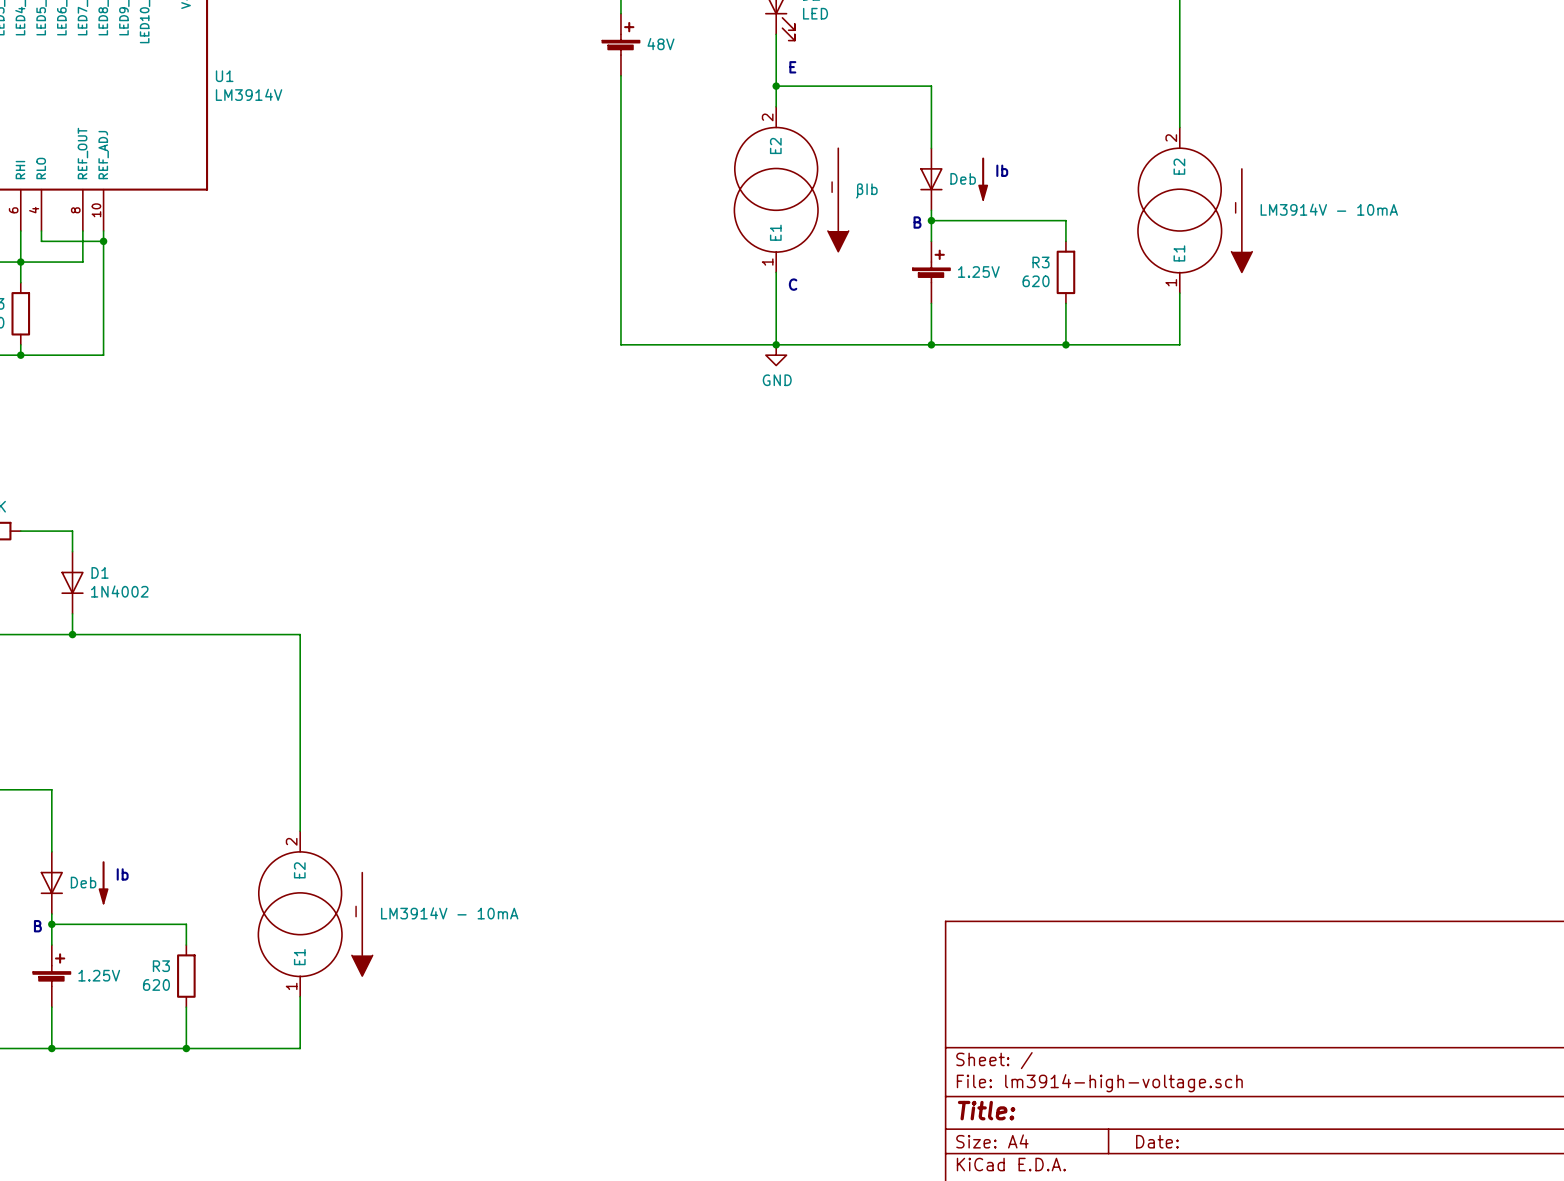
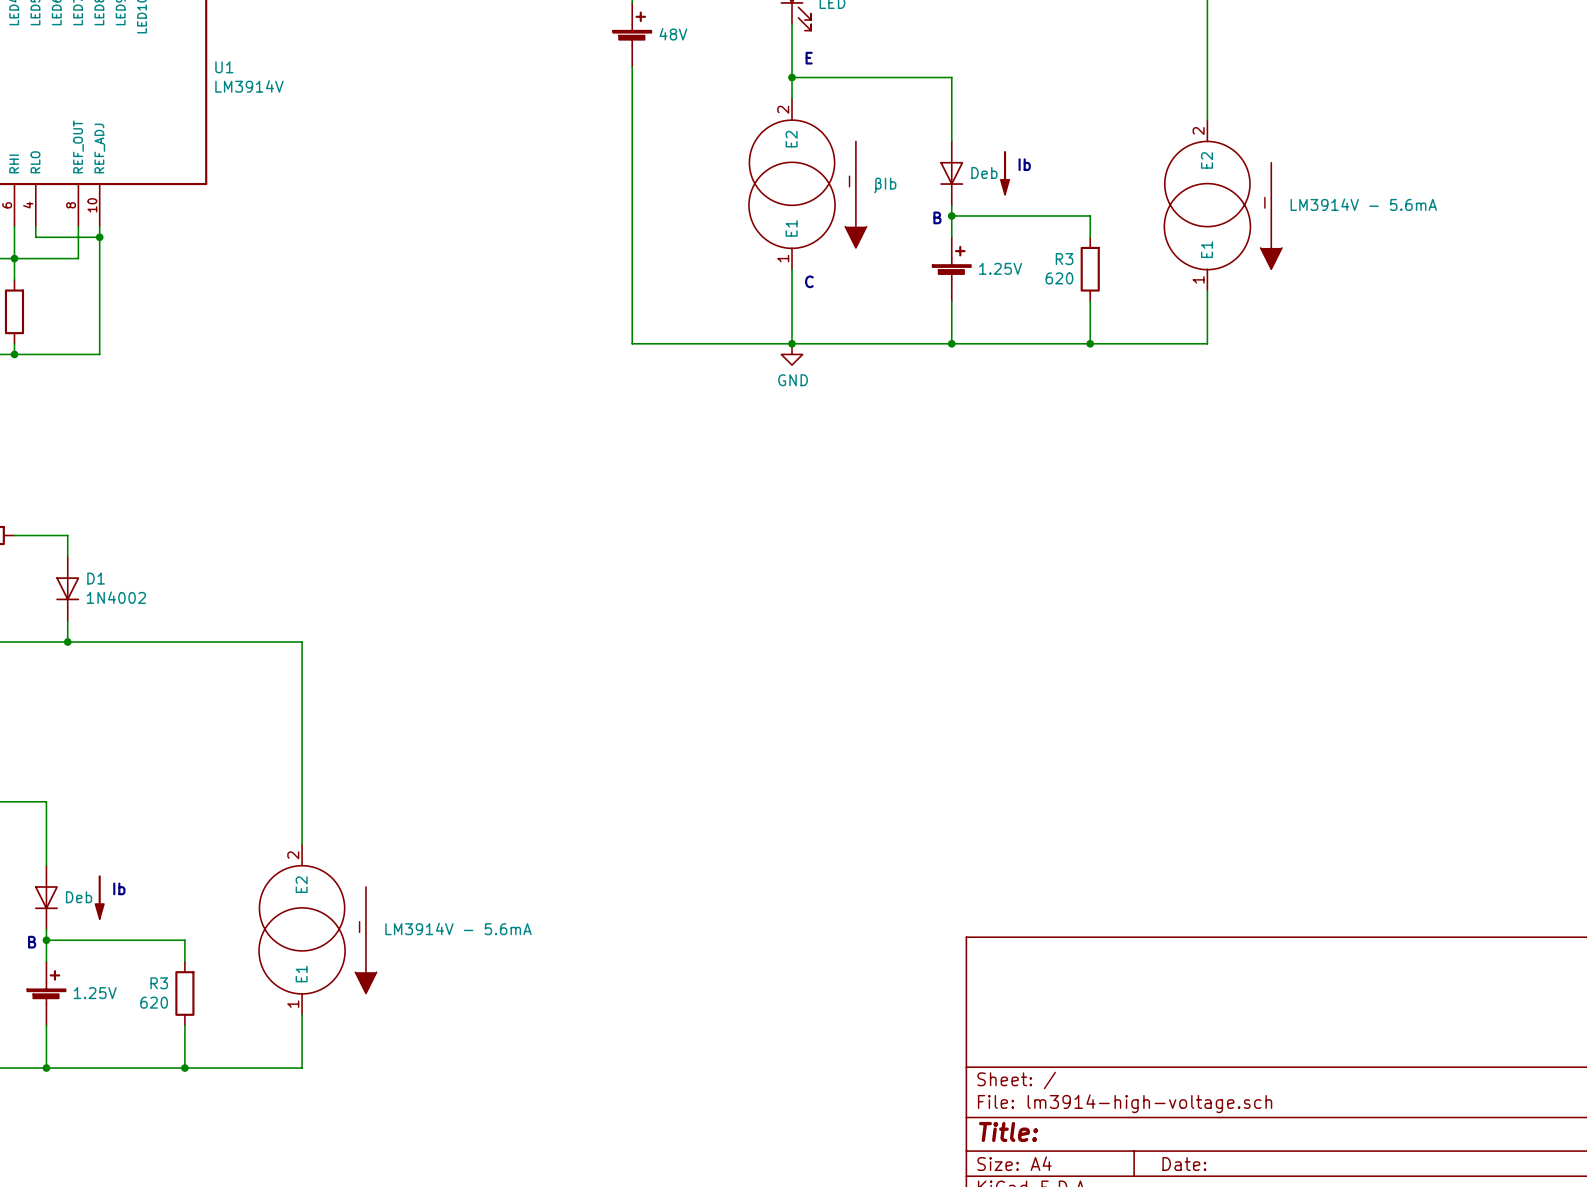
part value: LM3914V - 10mA (1329, 209) -> LM3914V - 5.6mA (1363, 204)
part value: LM3914V - 10mA (449, 913) -> LM3914V - 5.6mA (458, 928)

